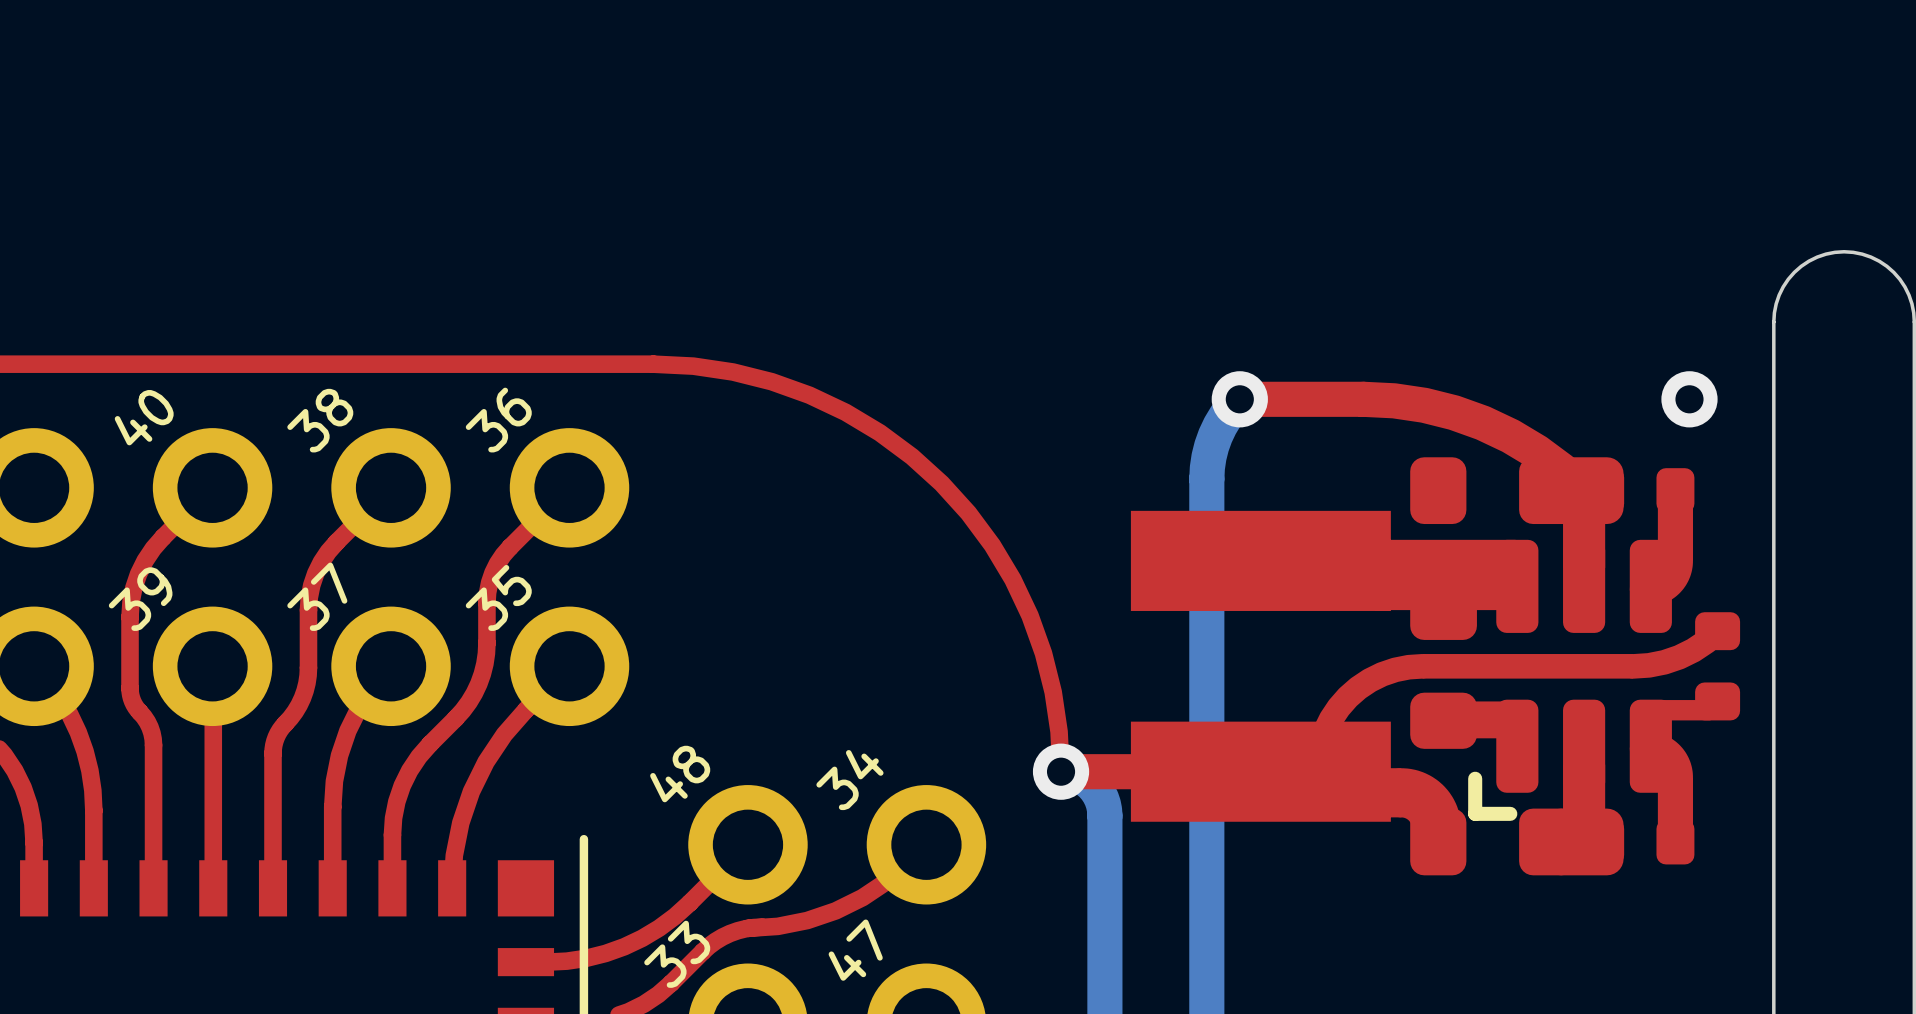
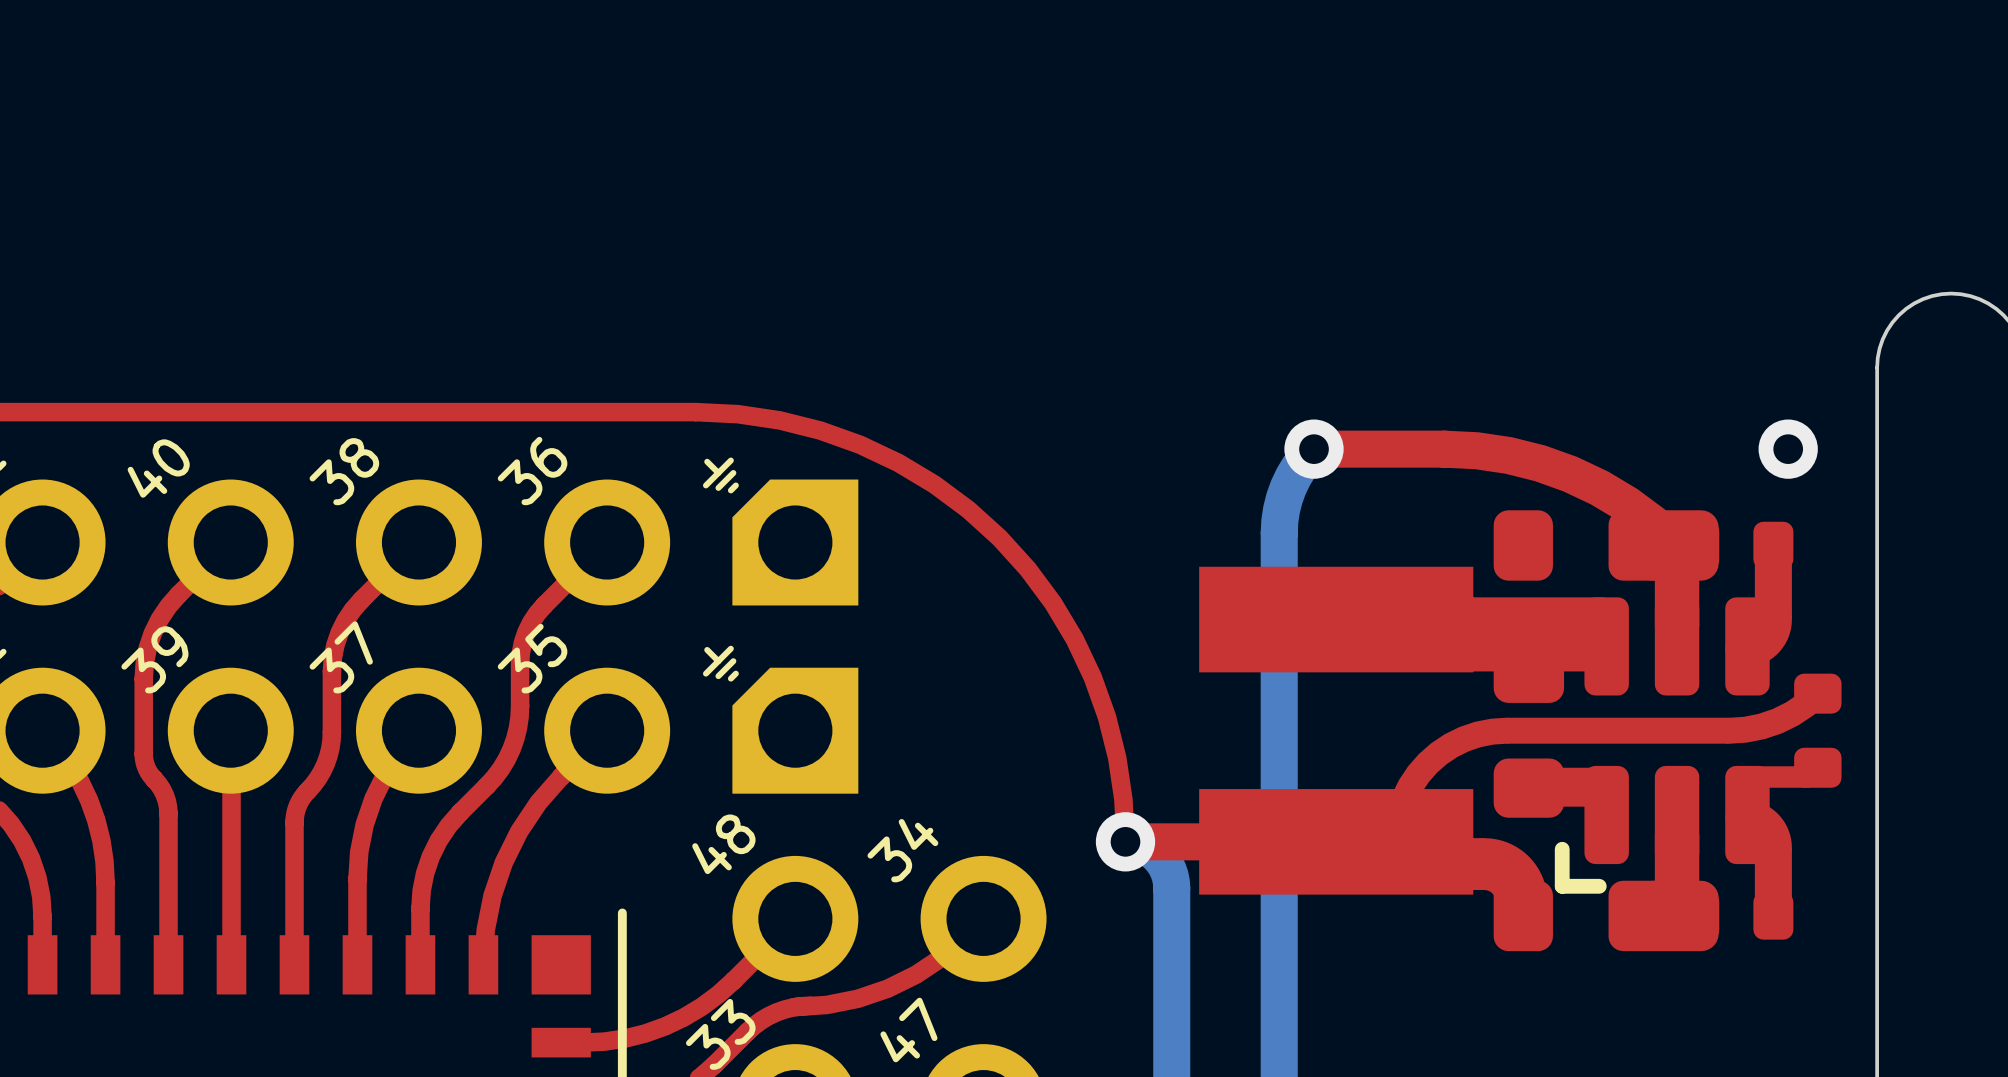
part: none -> ⏚ (795, 542)
part: none -> ⏚ (795, 730)

